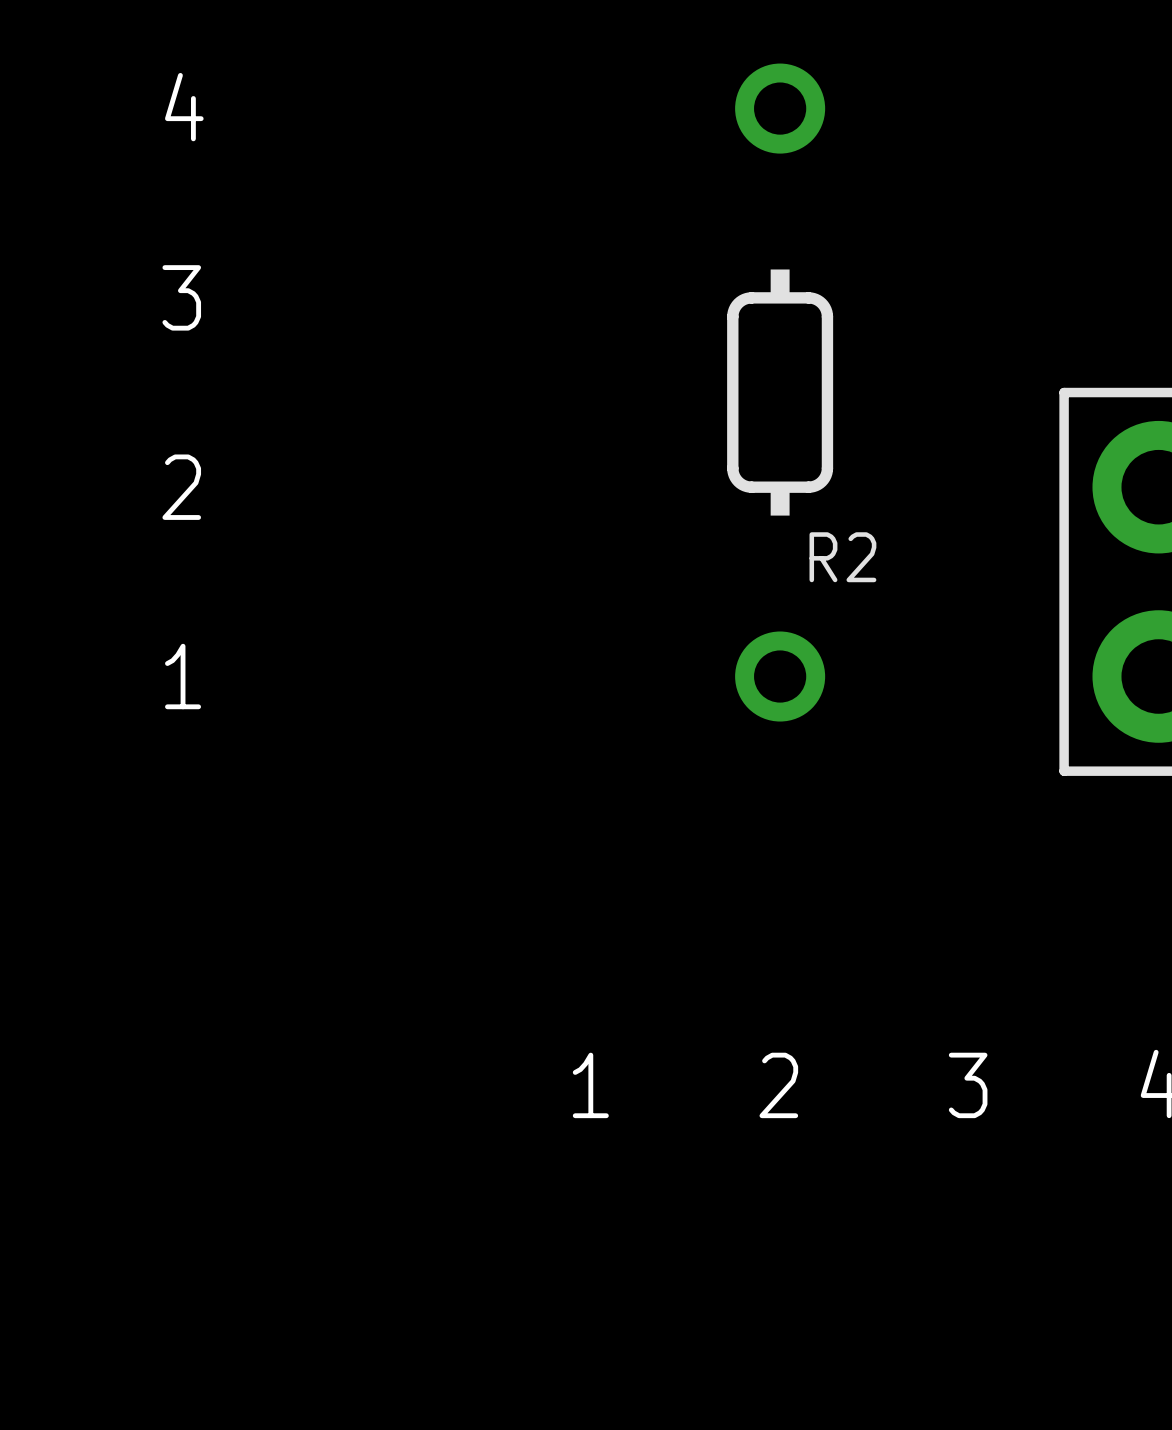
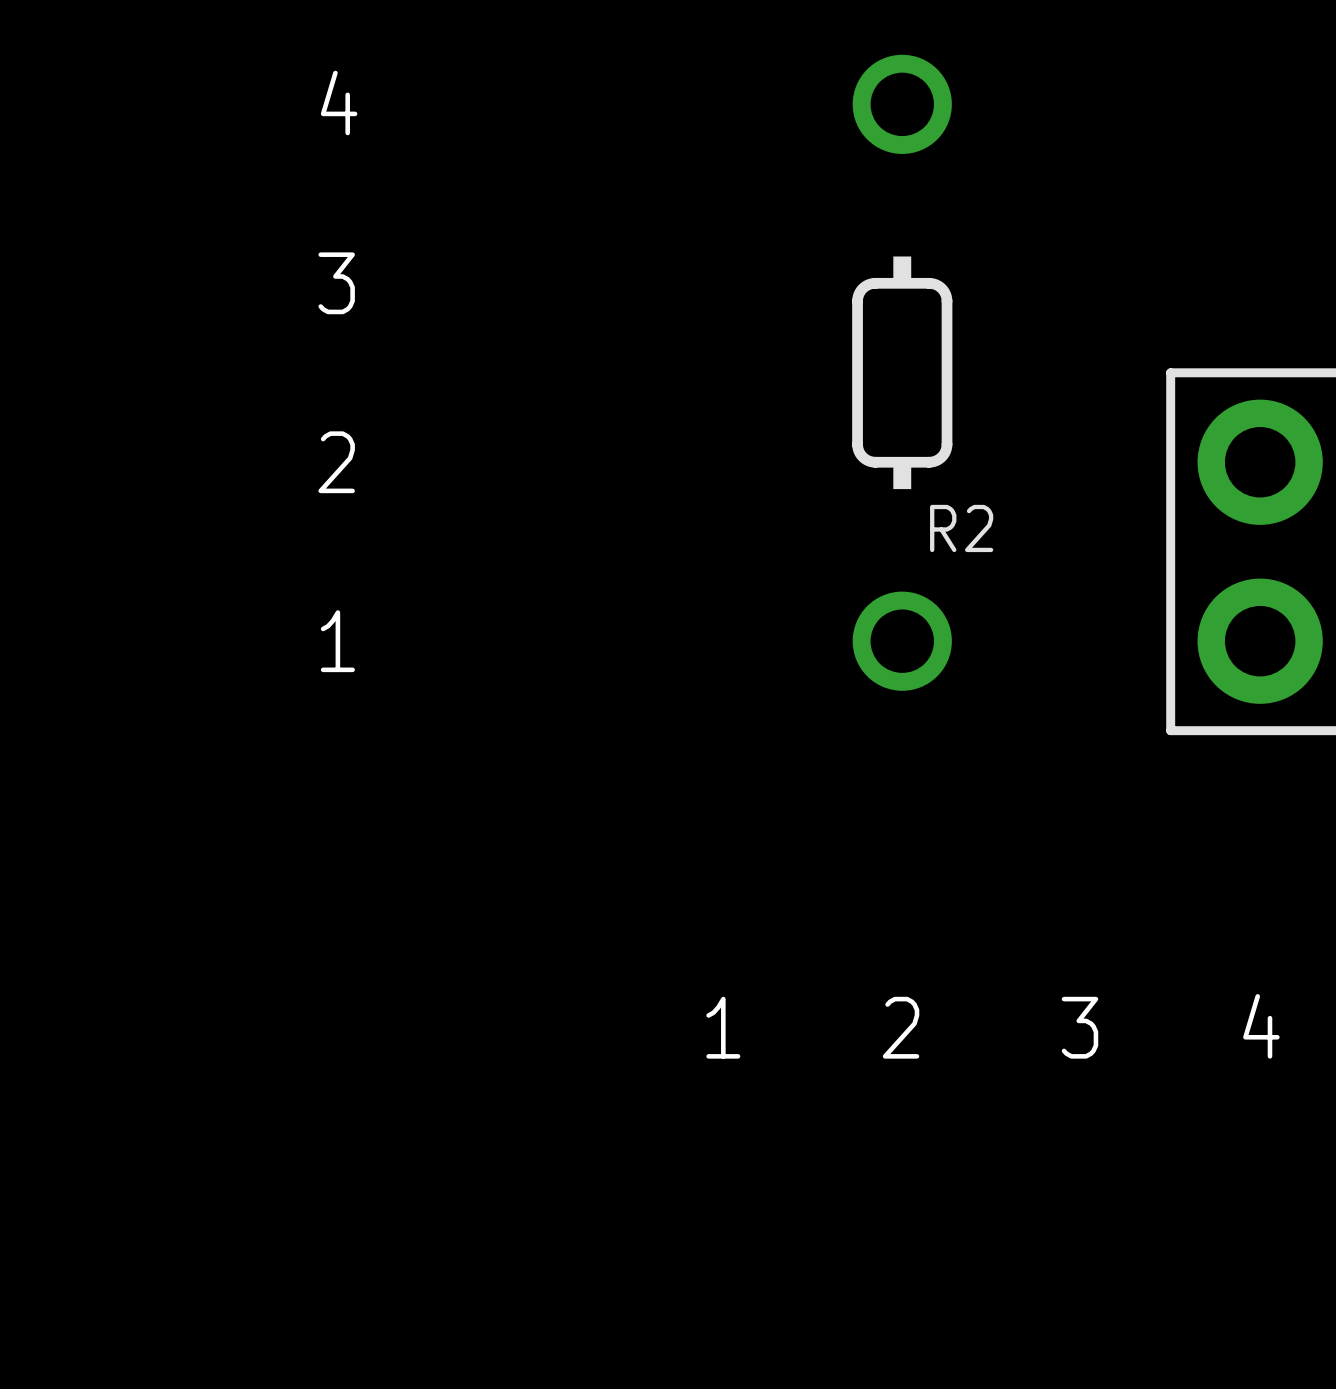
R2 footprint: [727, 63, 834, 722] -> [852, 54, 953, 691]

